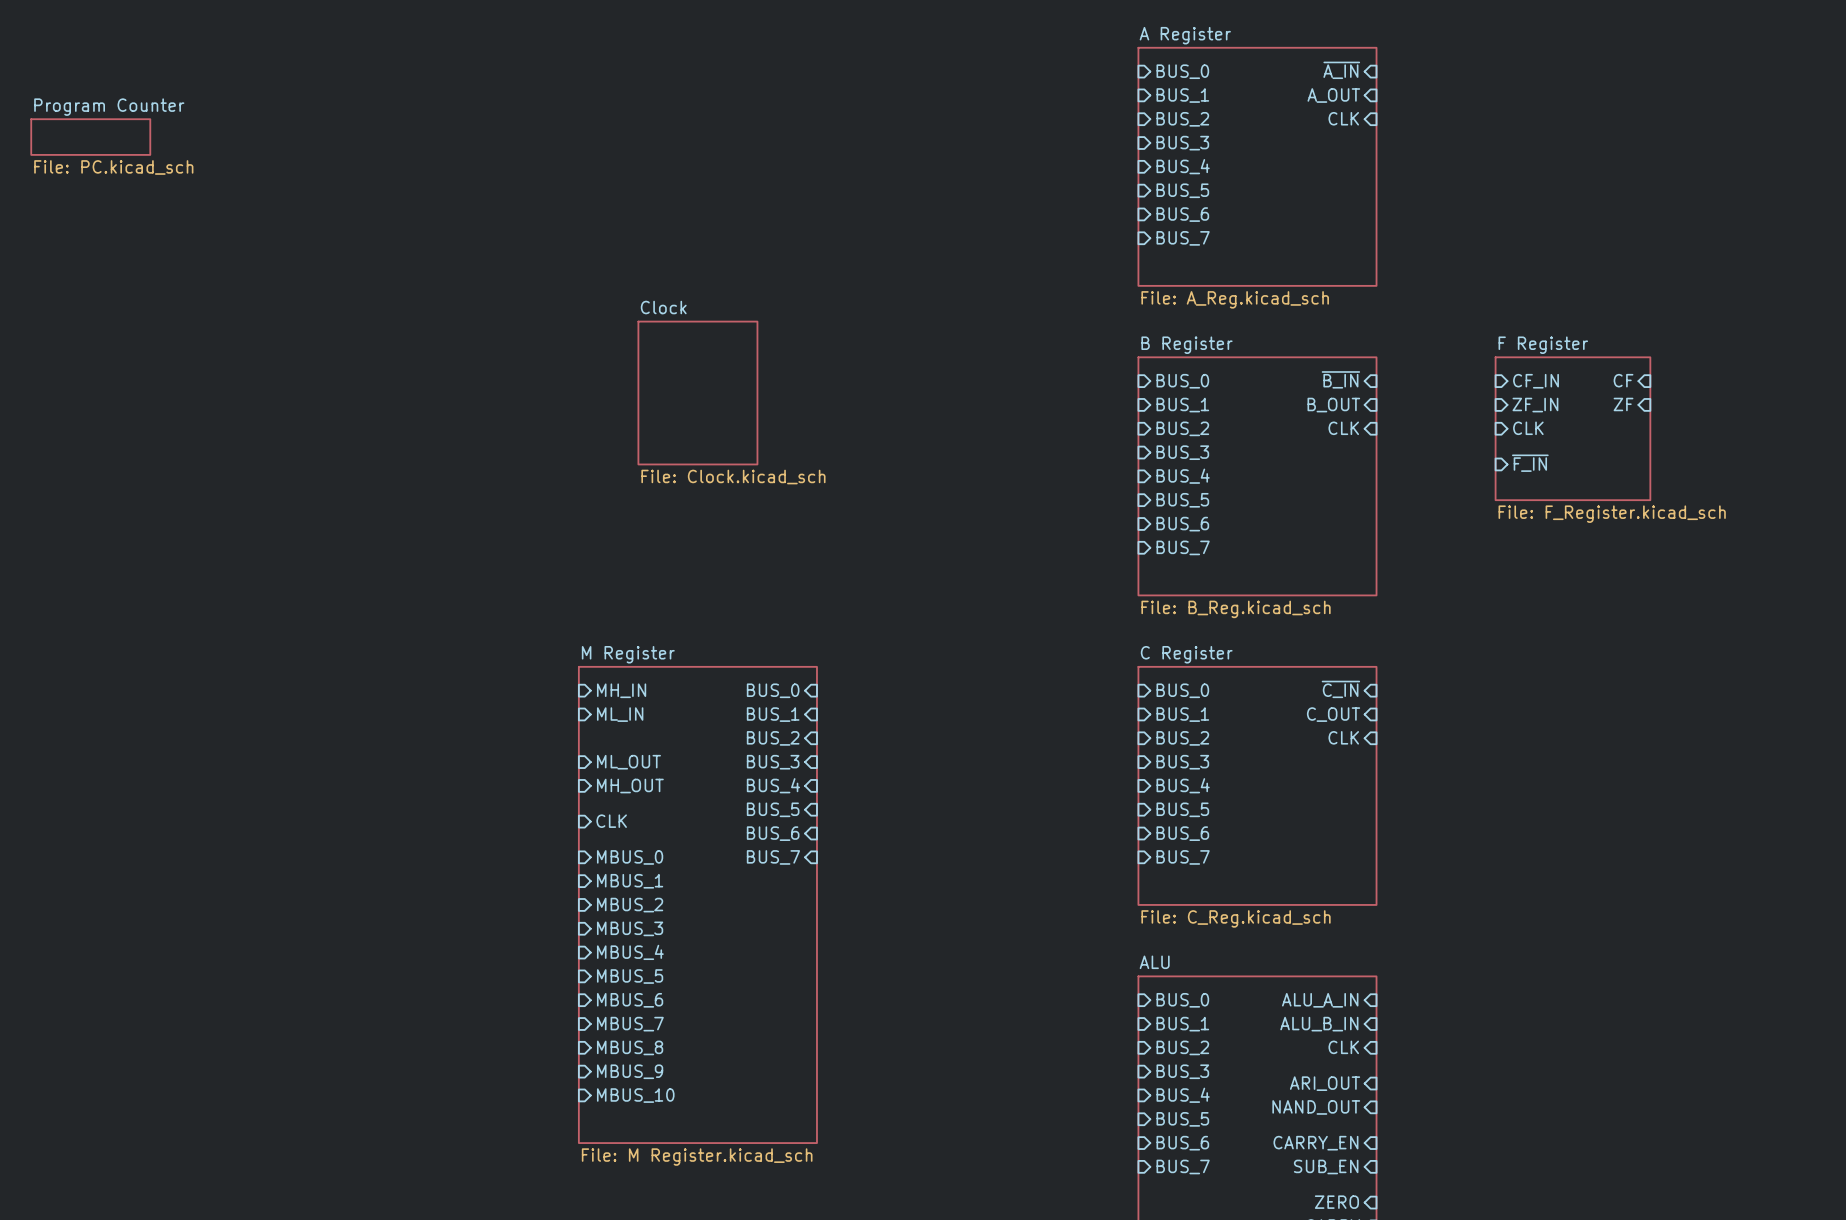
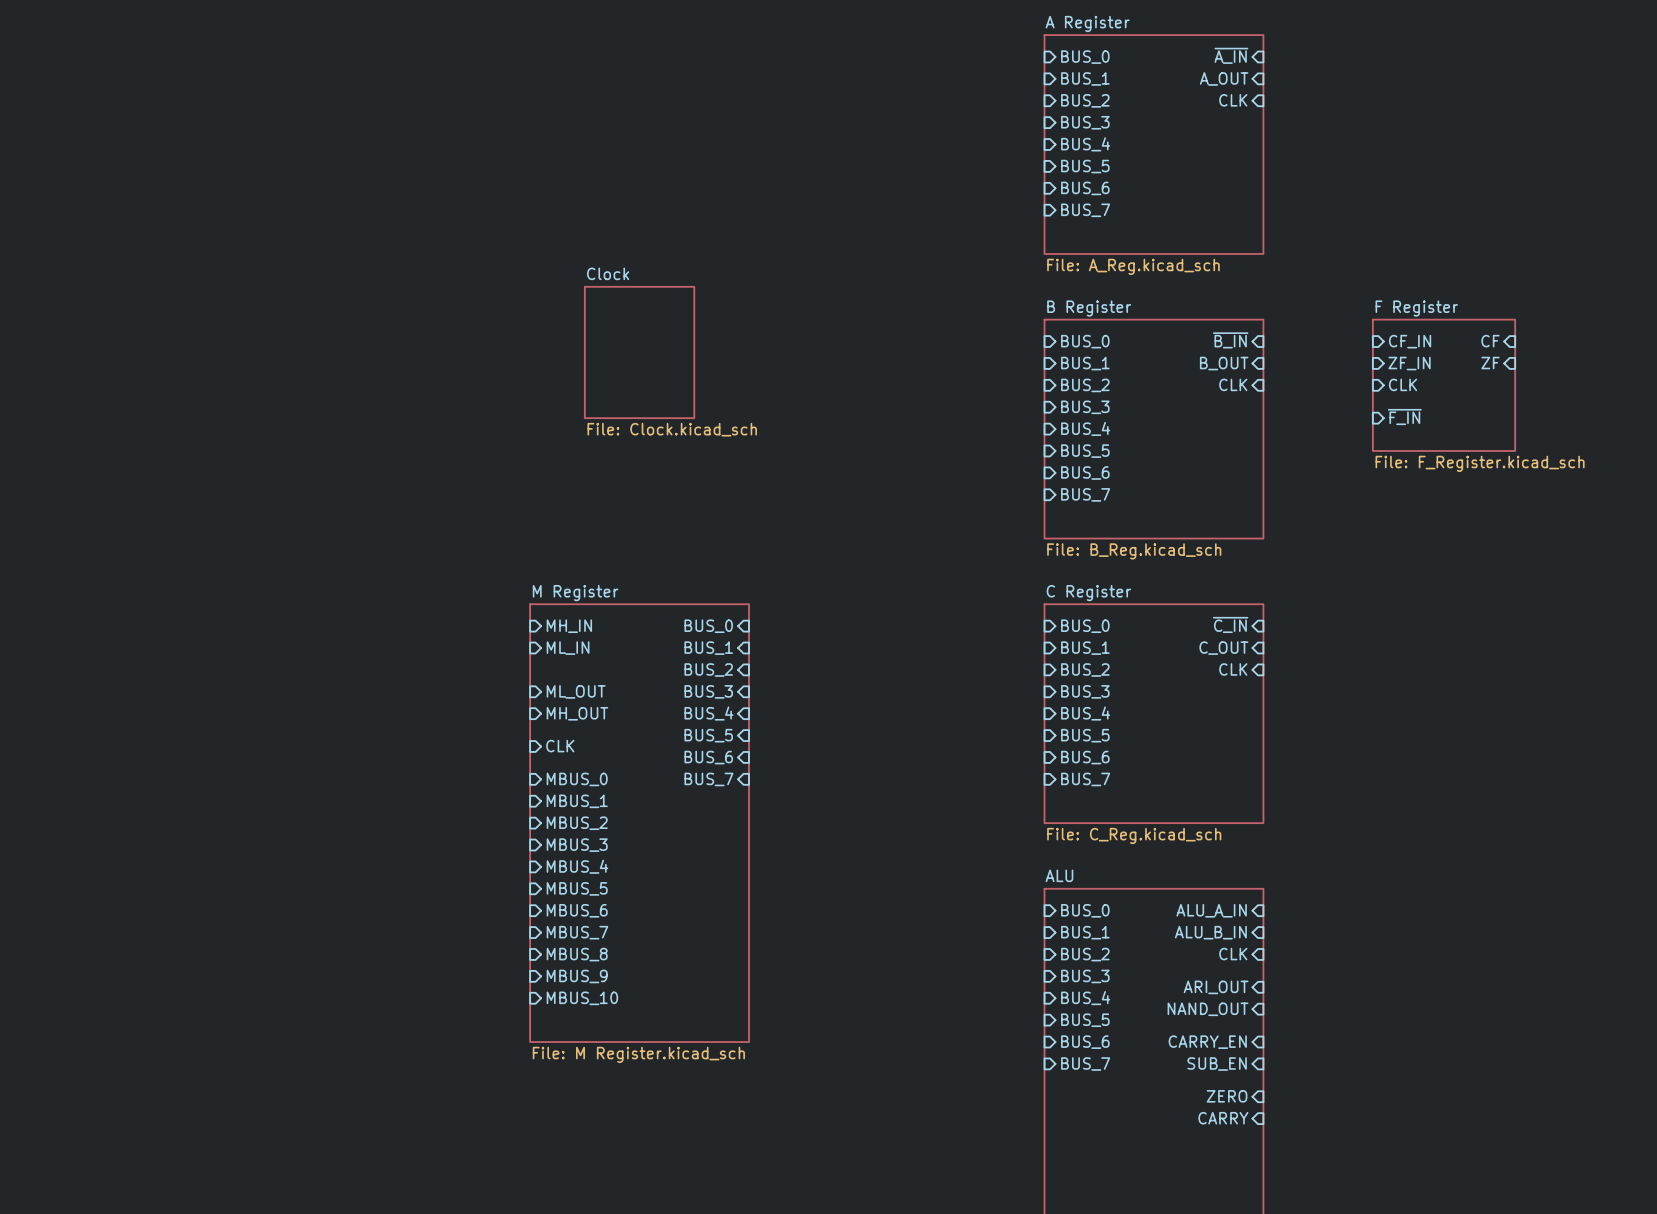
sheet Program Counter: File: PC.kicad_sch (90, 137) -> none

